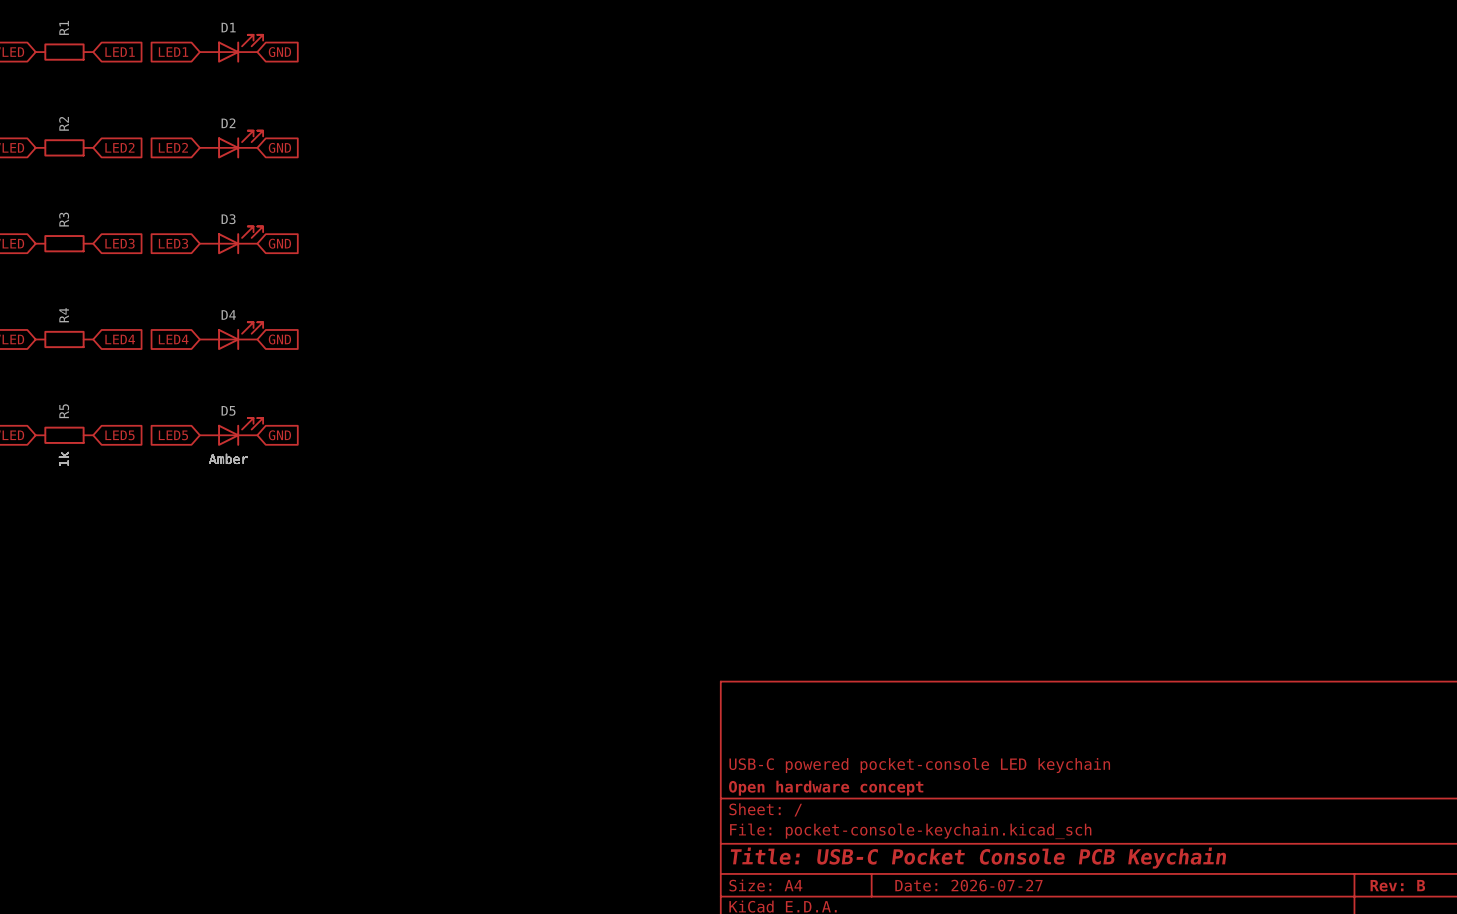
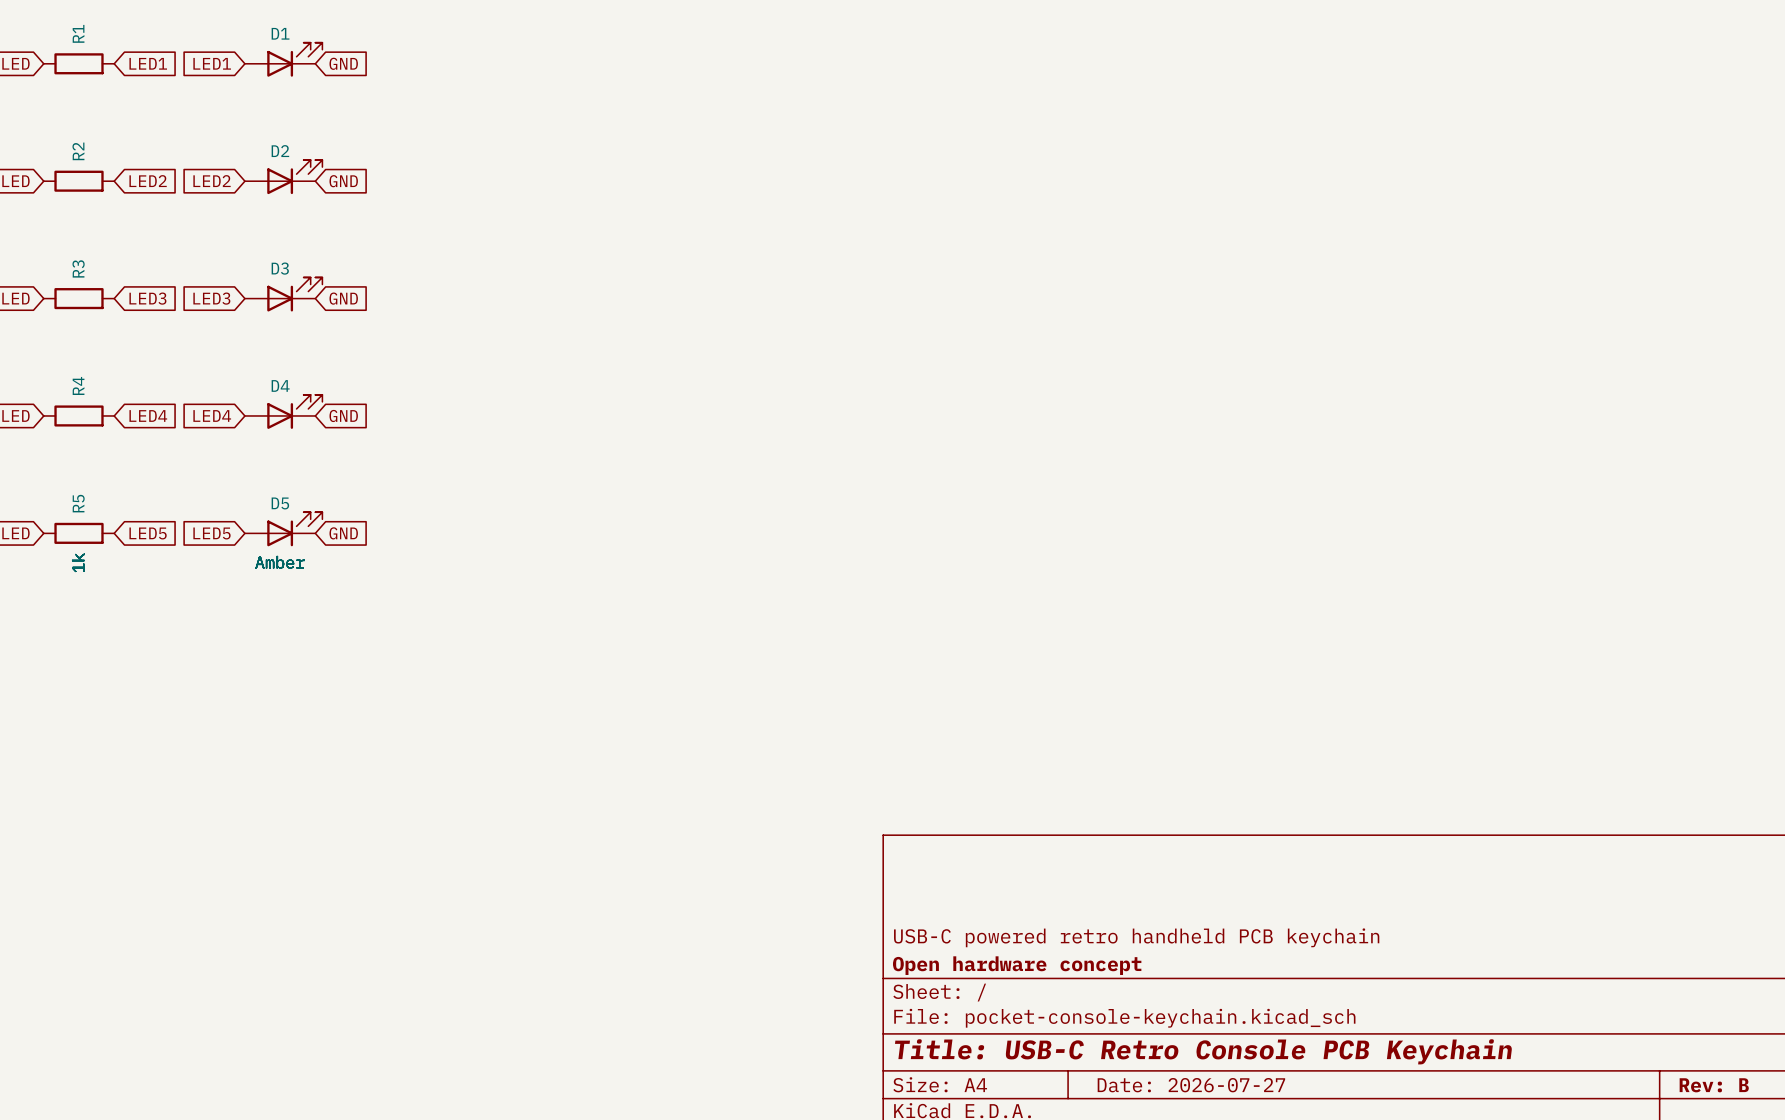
title block: USB-C powered pocket-console LED keychain (919, 765) -> USB-C powered retro handheld PCB keychain (1136, 937)
title block: Title: USB-C Pocket Console PCB Keychain (978, 858) -> Title: USB-C Retro Console PCB Keychain (1203, 1051)

